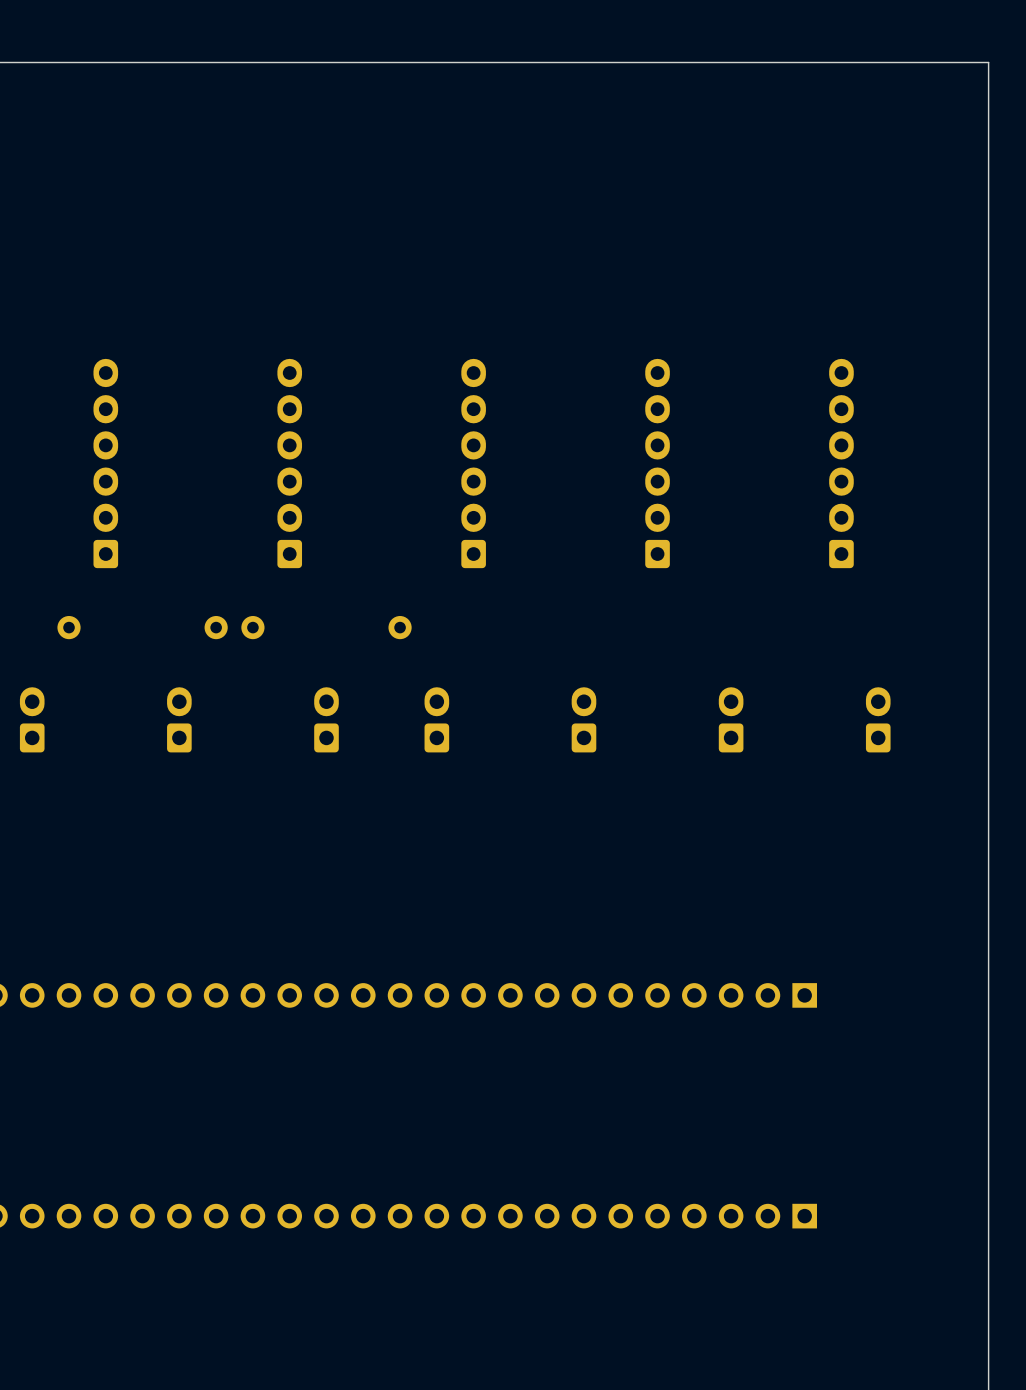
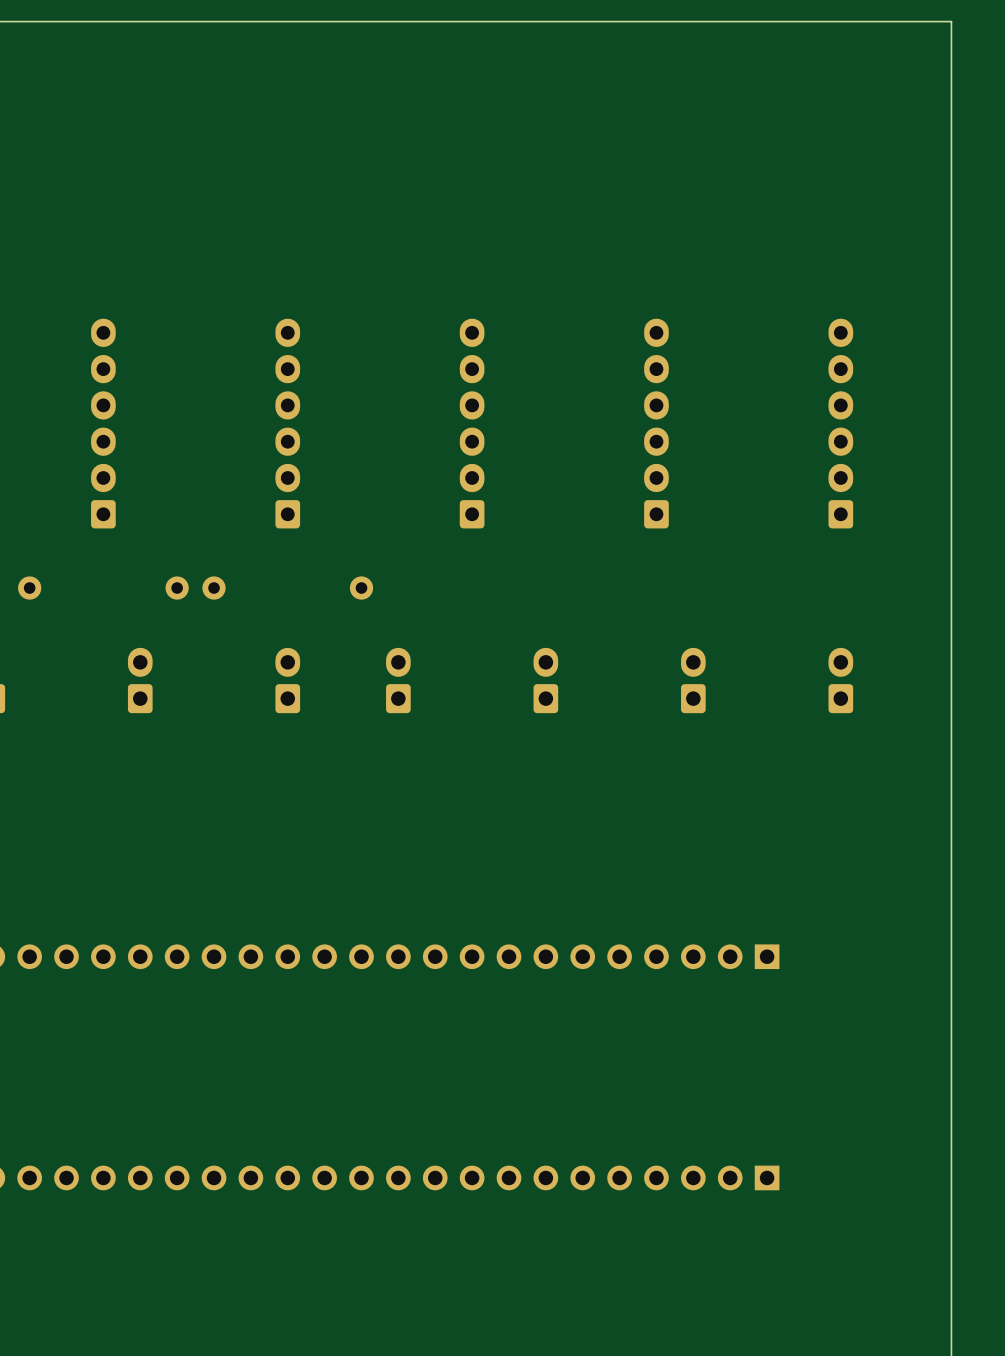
part position: (105, 463) -> (103, 423)
part position: (289, 463) -> (287, 423)
part position: (473, 463) -> (472, 423)
part position: (657, 463) -> (656, 423)
part position: (841, 463) -> (840, 423)

